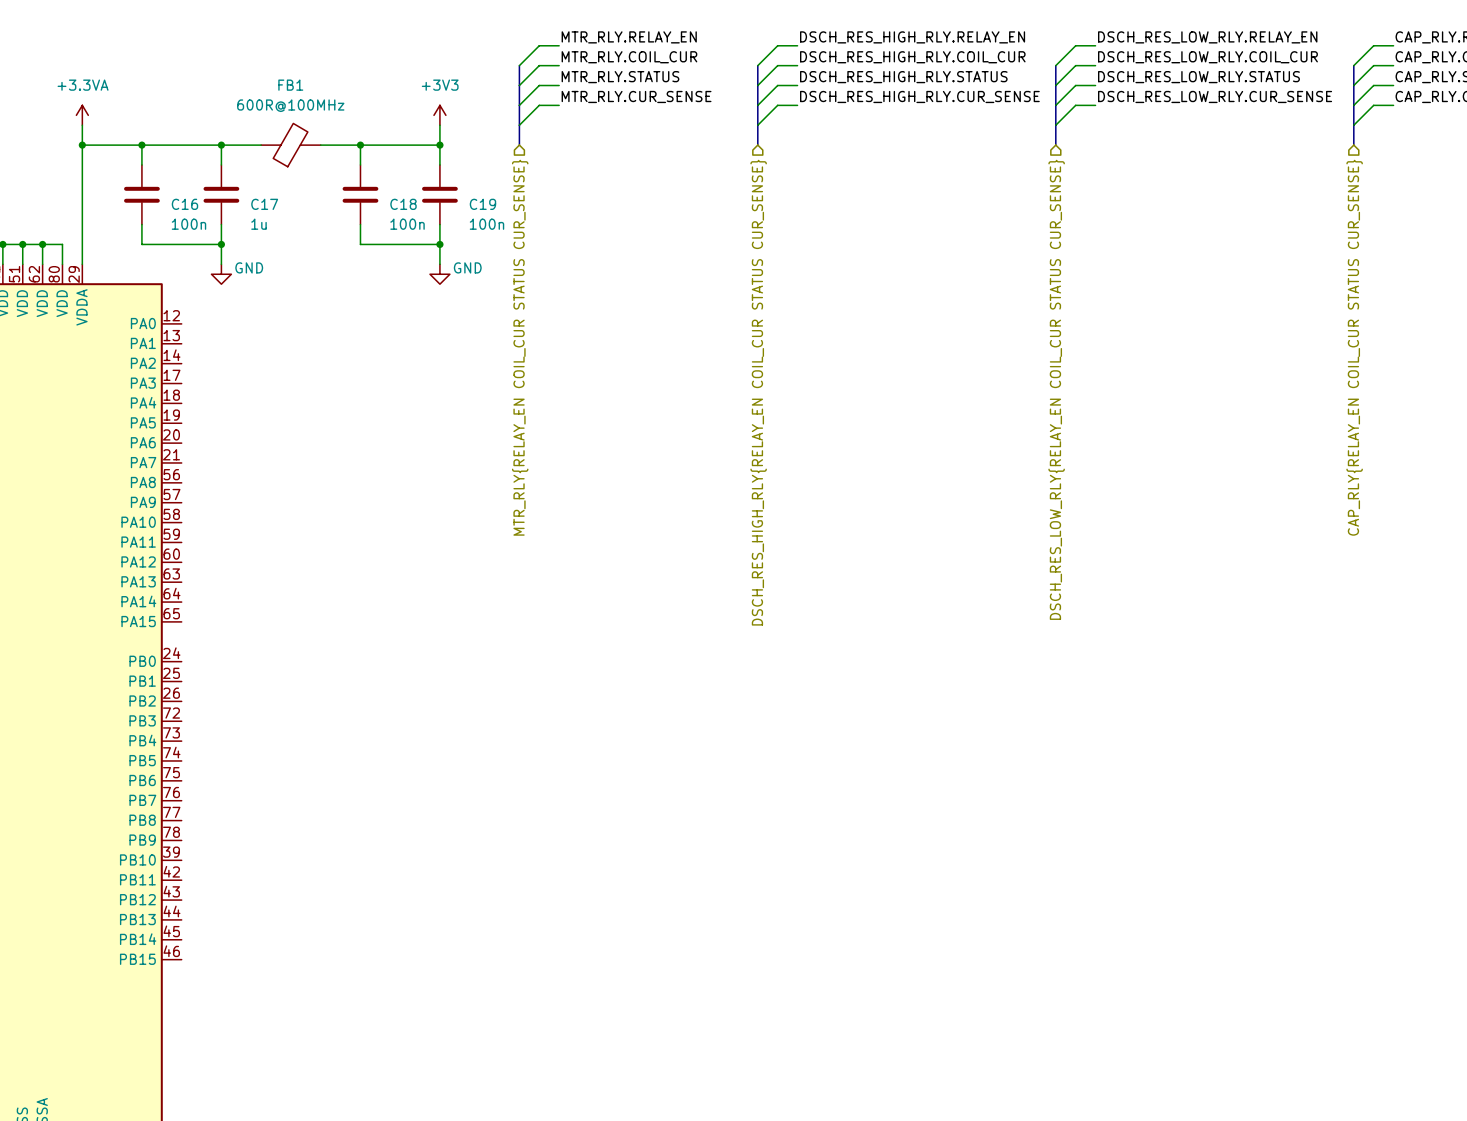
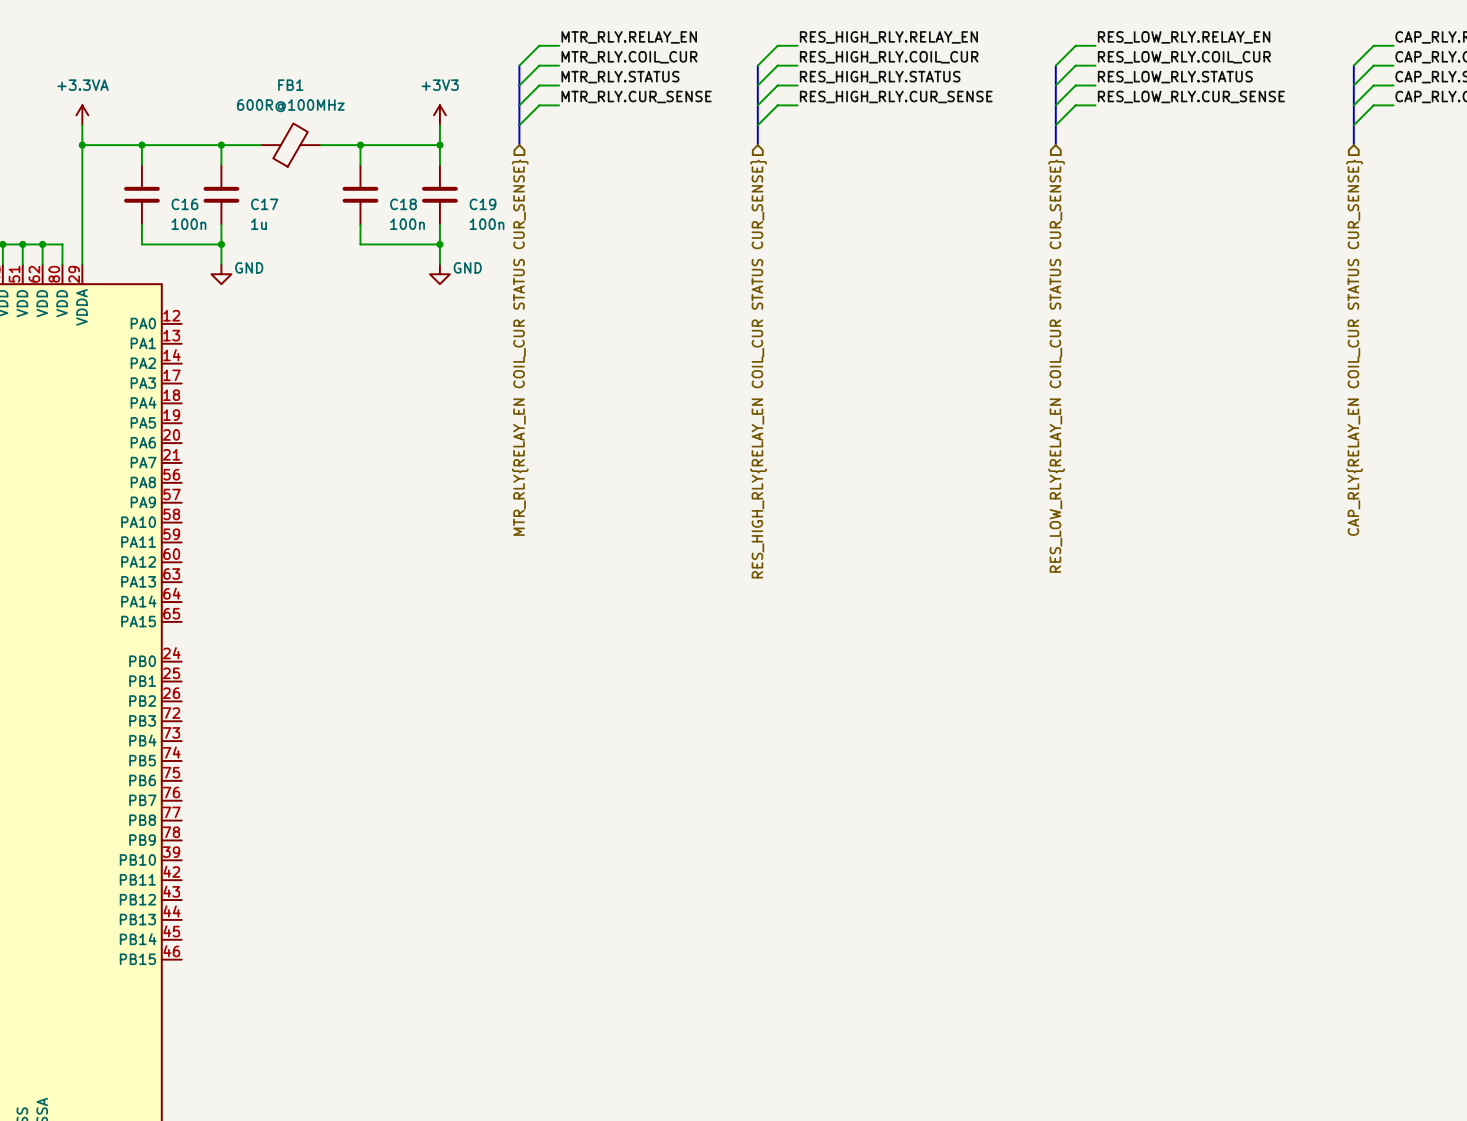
label: DSCH_RES_HIGH_RLY.RELAY_EN (912, 37) -> RES_HIGH_RLY.RELAY_EN (888, 37)
label: DSCH_RES_LOW_RLY.RELAY_EN (1207, 37) -> RES_LOW_RLY.RELAY_EN (1184, 37)
label: DSCH_RES_HIGH_RLY.COIL_CUR (912, 57) -> RES_HIGH_RLY.COIL_CUR (889, 57)
label: DSCH_RES_LOW_RLY.COIL_CUR (1207, 57) -> RES_LOW_RLY.COIL_CUR (1184, 57)
label: DSCH_RES_HIGH_RLY.STATUS (903, 77) -> RES_HIGH_RLY.STATUS (880, 77)
label: DSCH_RES_LOW_RLY.STATUS (1198, 77) -> RES_LOW_RLY.STATUS (1175, 77)
label: DSCH_RES_HIGH_RLY.CUR_SENSE (919, 96) -> RES_HIGH_RLY.CUR_SENSE (896, 96)
label: DSCH_RES_LOW_RLY.CUR_SENSE (1215, 96) -> RES_LOW_RLY.CUR_SENSE (1191, 96)
hierarchical label: DSCH_RES_LOW_RLY{RELAY_EN COIL_CUR STATUS CUR_SENSE} (1056, 389) -> RES_LOW_RLY{RELAY_EN COIL_CUR STATUS CUR_SENSE} (1056, 366)
hierarchical label: DSCH_RES_HIGH_RLY{RELAY_EN COIL_CUR STATUS CUR_SENSE} (758, 392) -> RES_HIGH_RLY{RELAY_EN COIL_CUR STATUS CUR_SENSE} (758, 369)

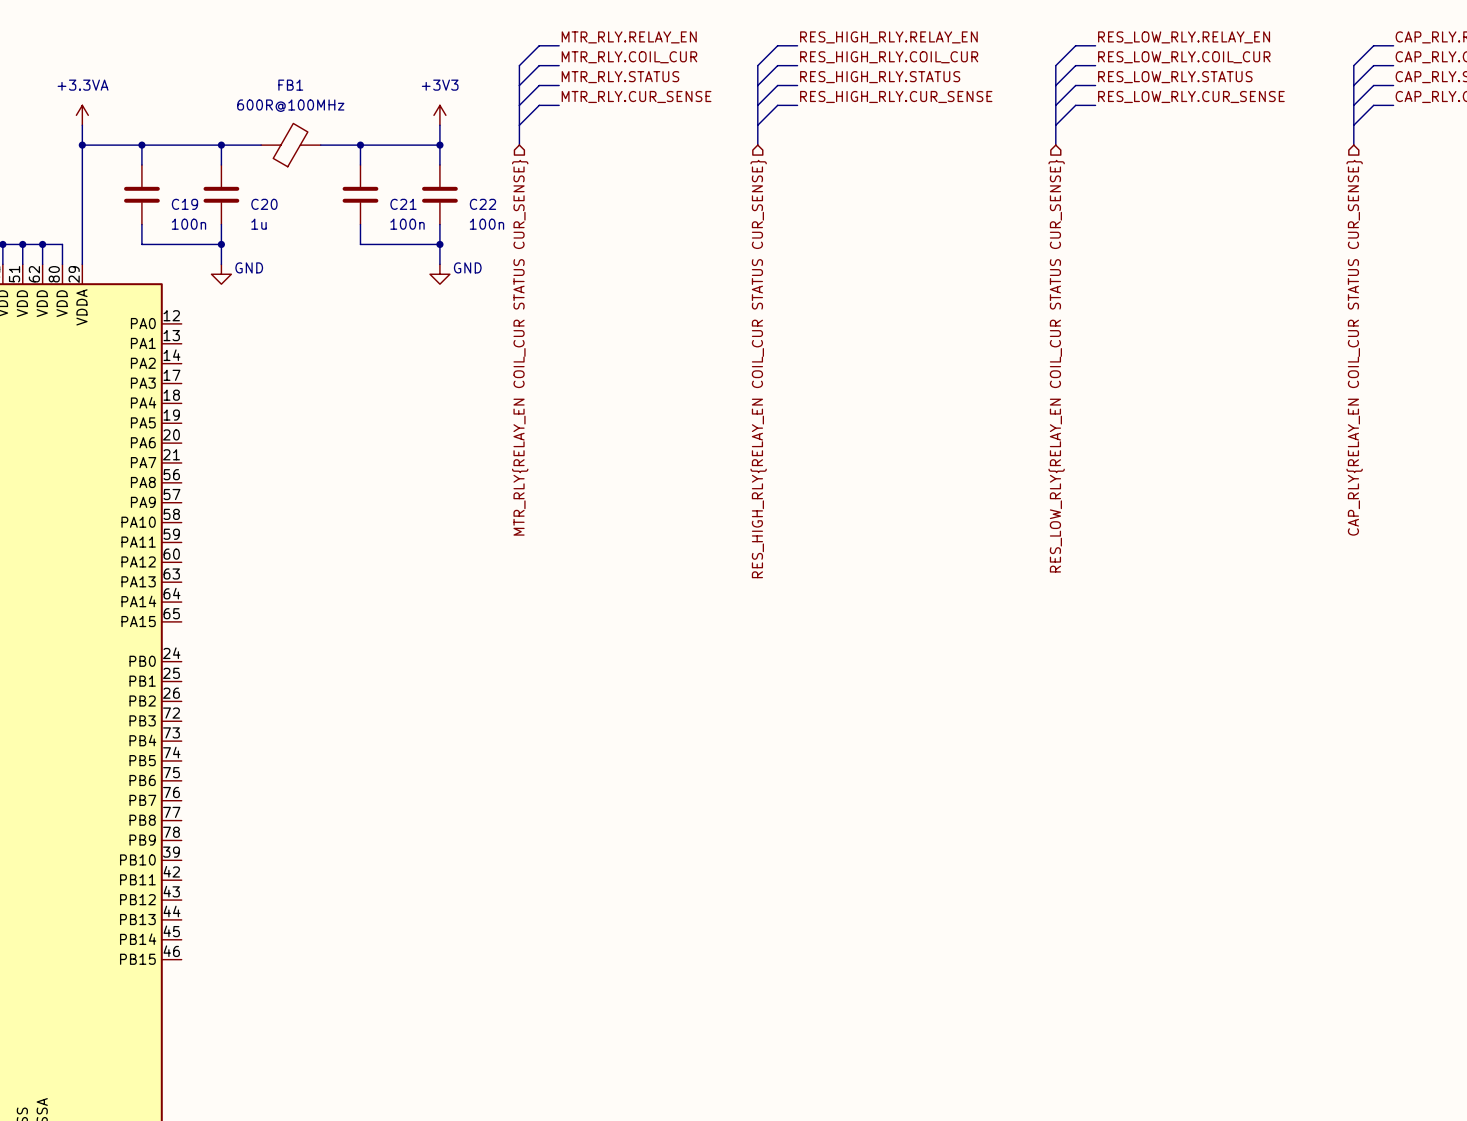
C16 name: C16 (184, 204) -> C19 (184, 204)
C17 name: C17 (264, 204) -> C20 (264, 204)
C18 name: C18 (403, 204) -> C21 (403, 204)
C19 name: C19 (482, 204) -> C22 (482, 204)

